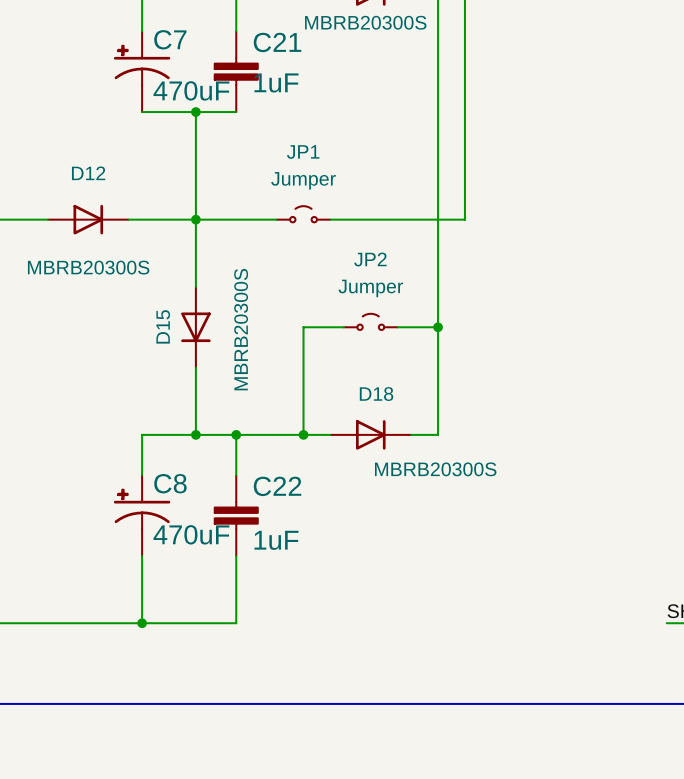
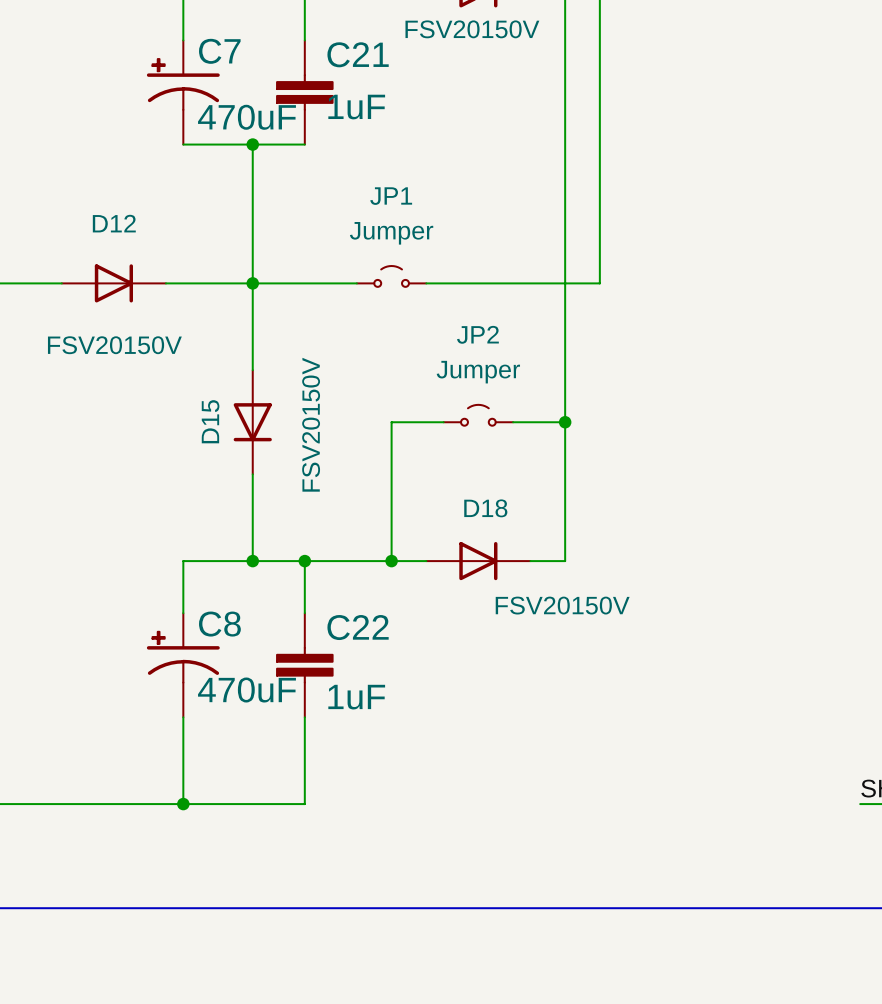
part value: MBRB20300S (365, 22) -> FSV20150V (472, 29)
D12 value: MBRB20300S (88, 267) -> FSV20150V (114, 345)
D15 value: MBRB20300S (241, 329) -> FSV20150V (311, 424)
D18 value: MBRB20300S (435, 469) -> FSV20150V (562, 605)

